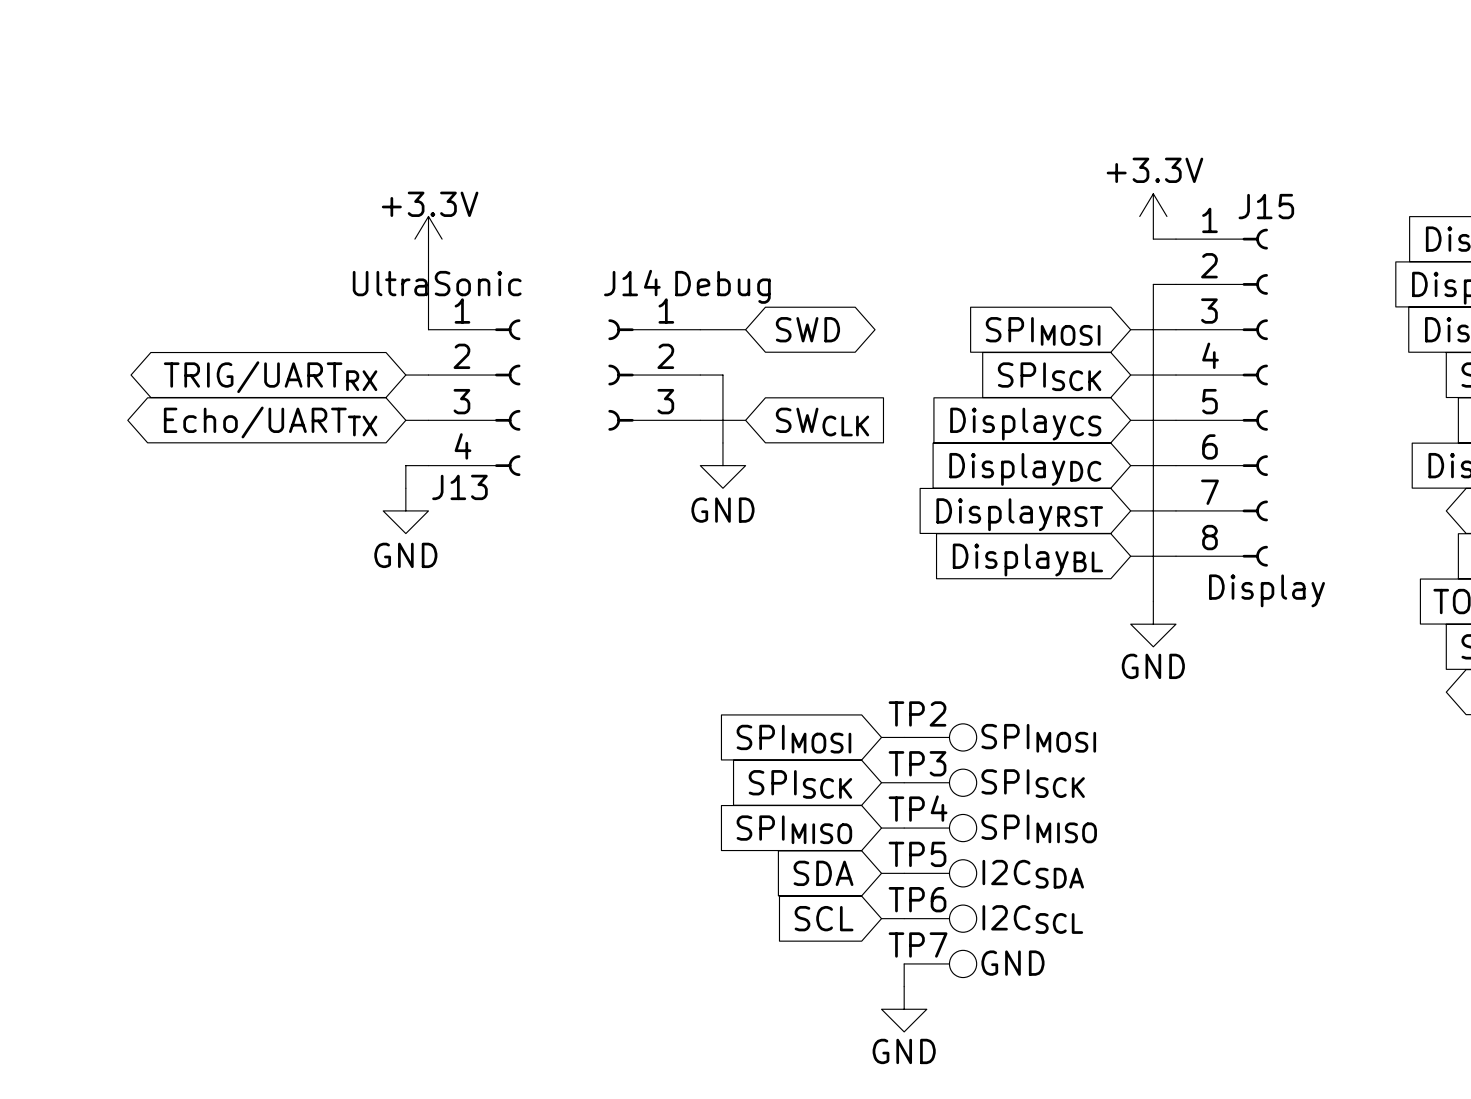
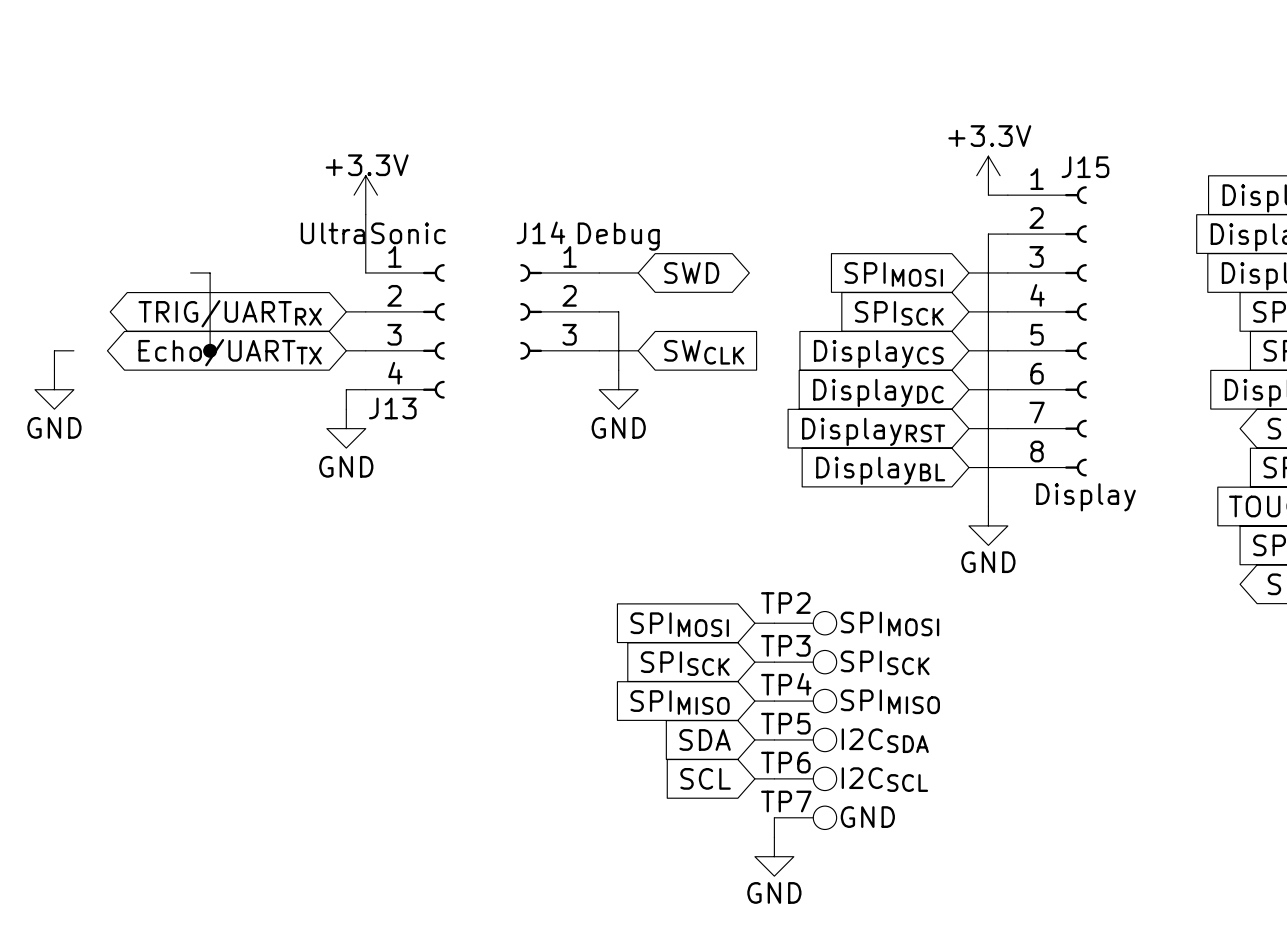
wire: none -> (190, 272) (210, 272) (210, 350)
wire: none -> (73, 350) (54, 350) (54, 370)
junction: none -> (210, 350)
power symbol: none -> GND (54, 389)

